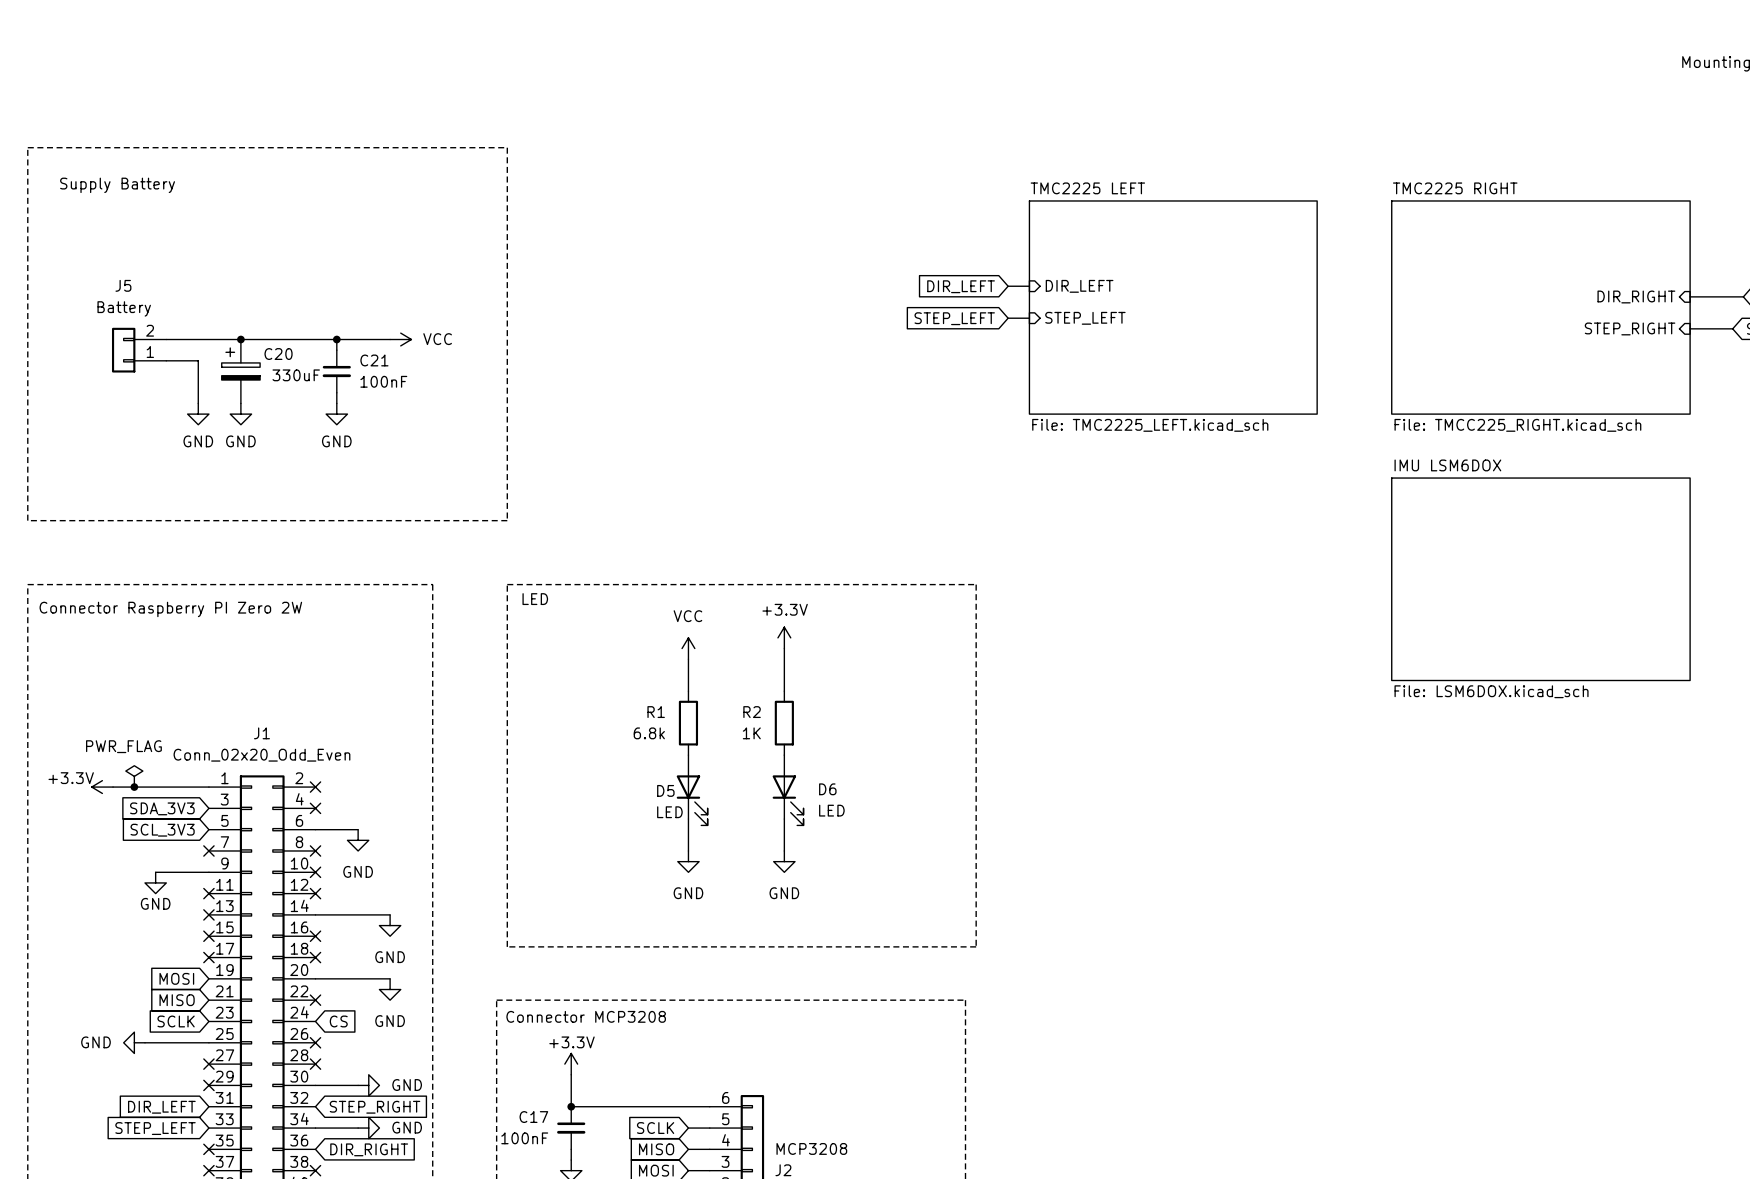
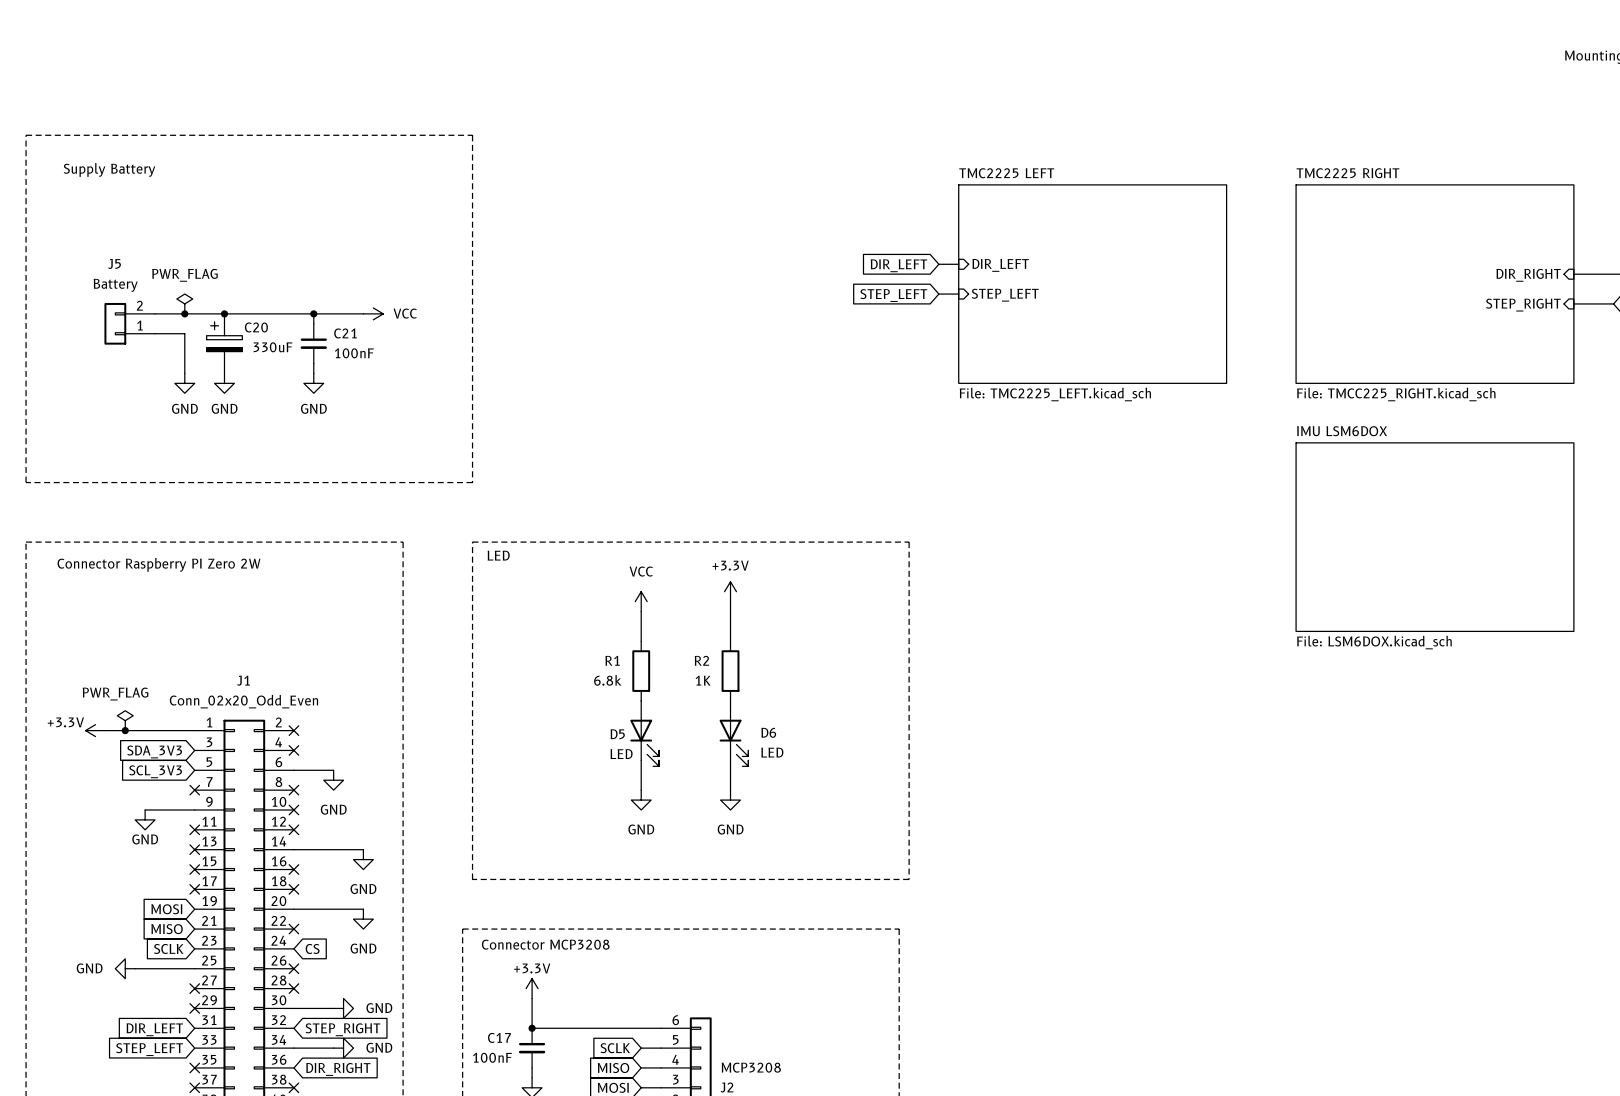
power symbol: none -> PWR_FLAG (184, 303)
junction: none -> (184, 313)

